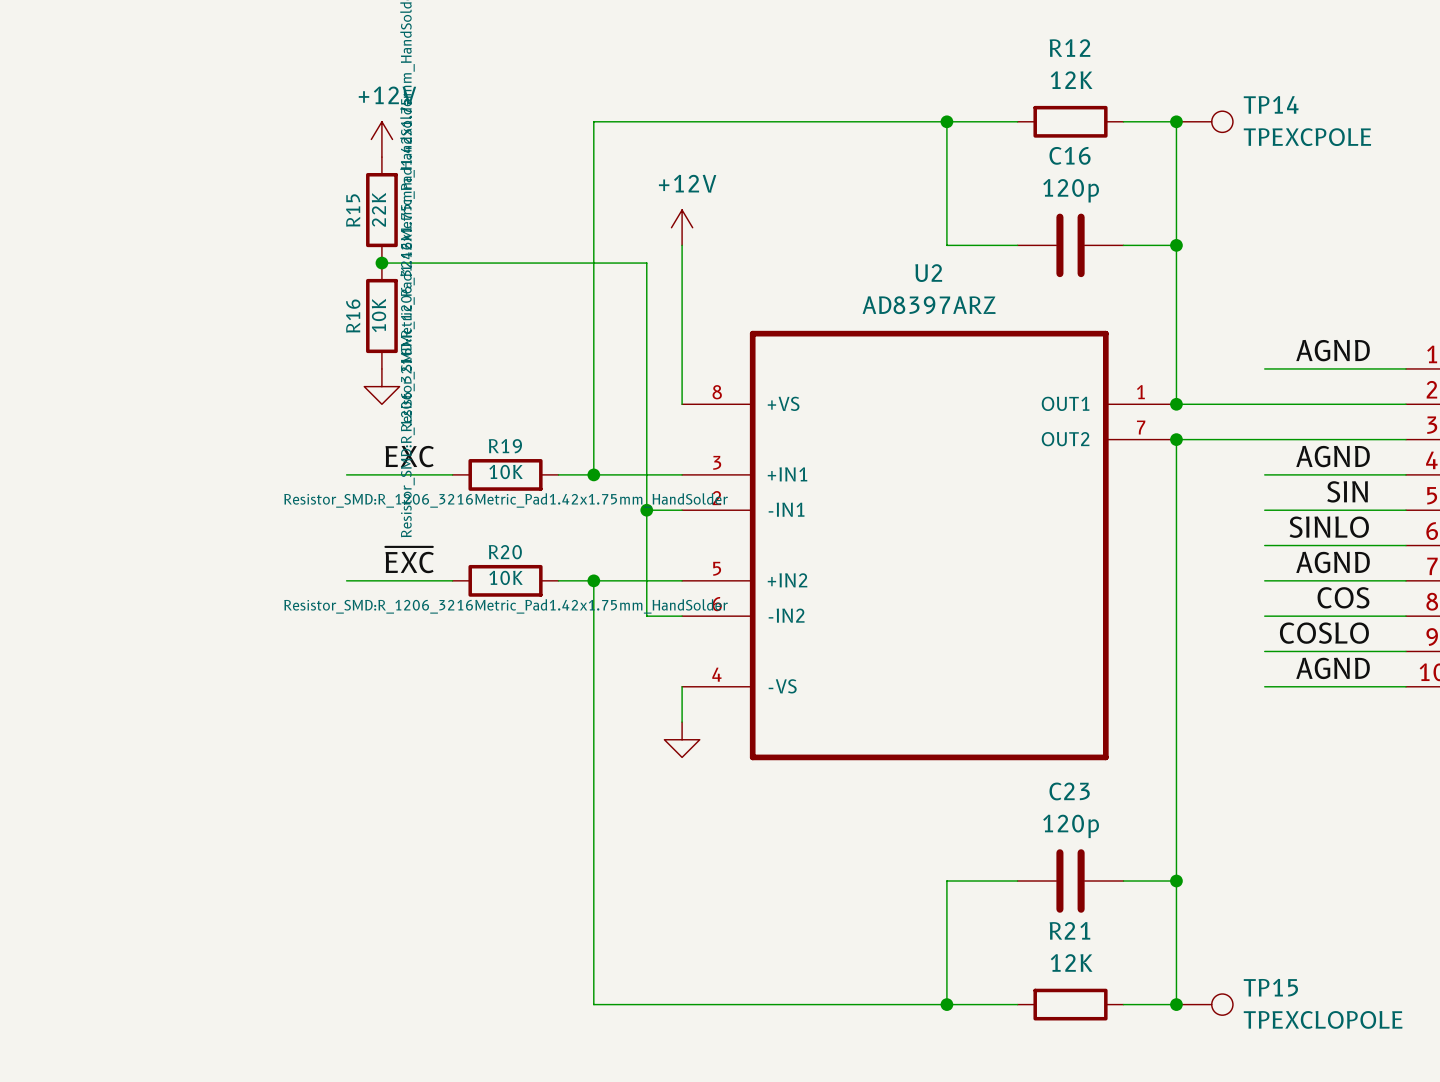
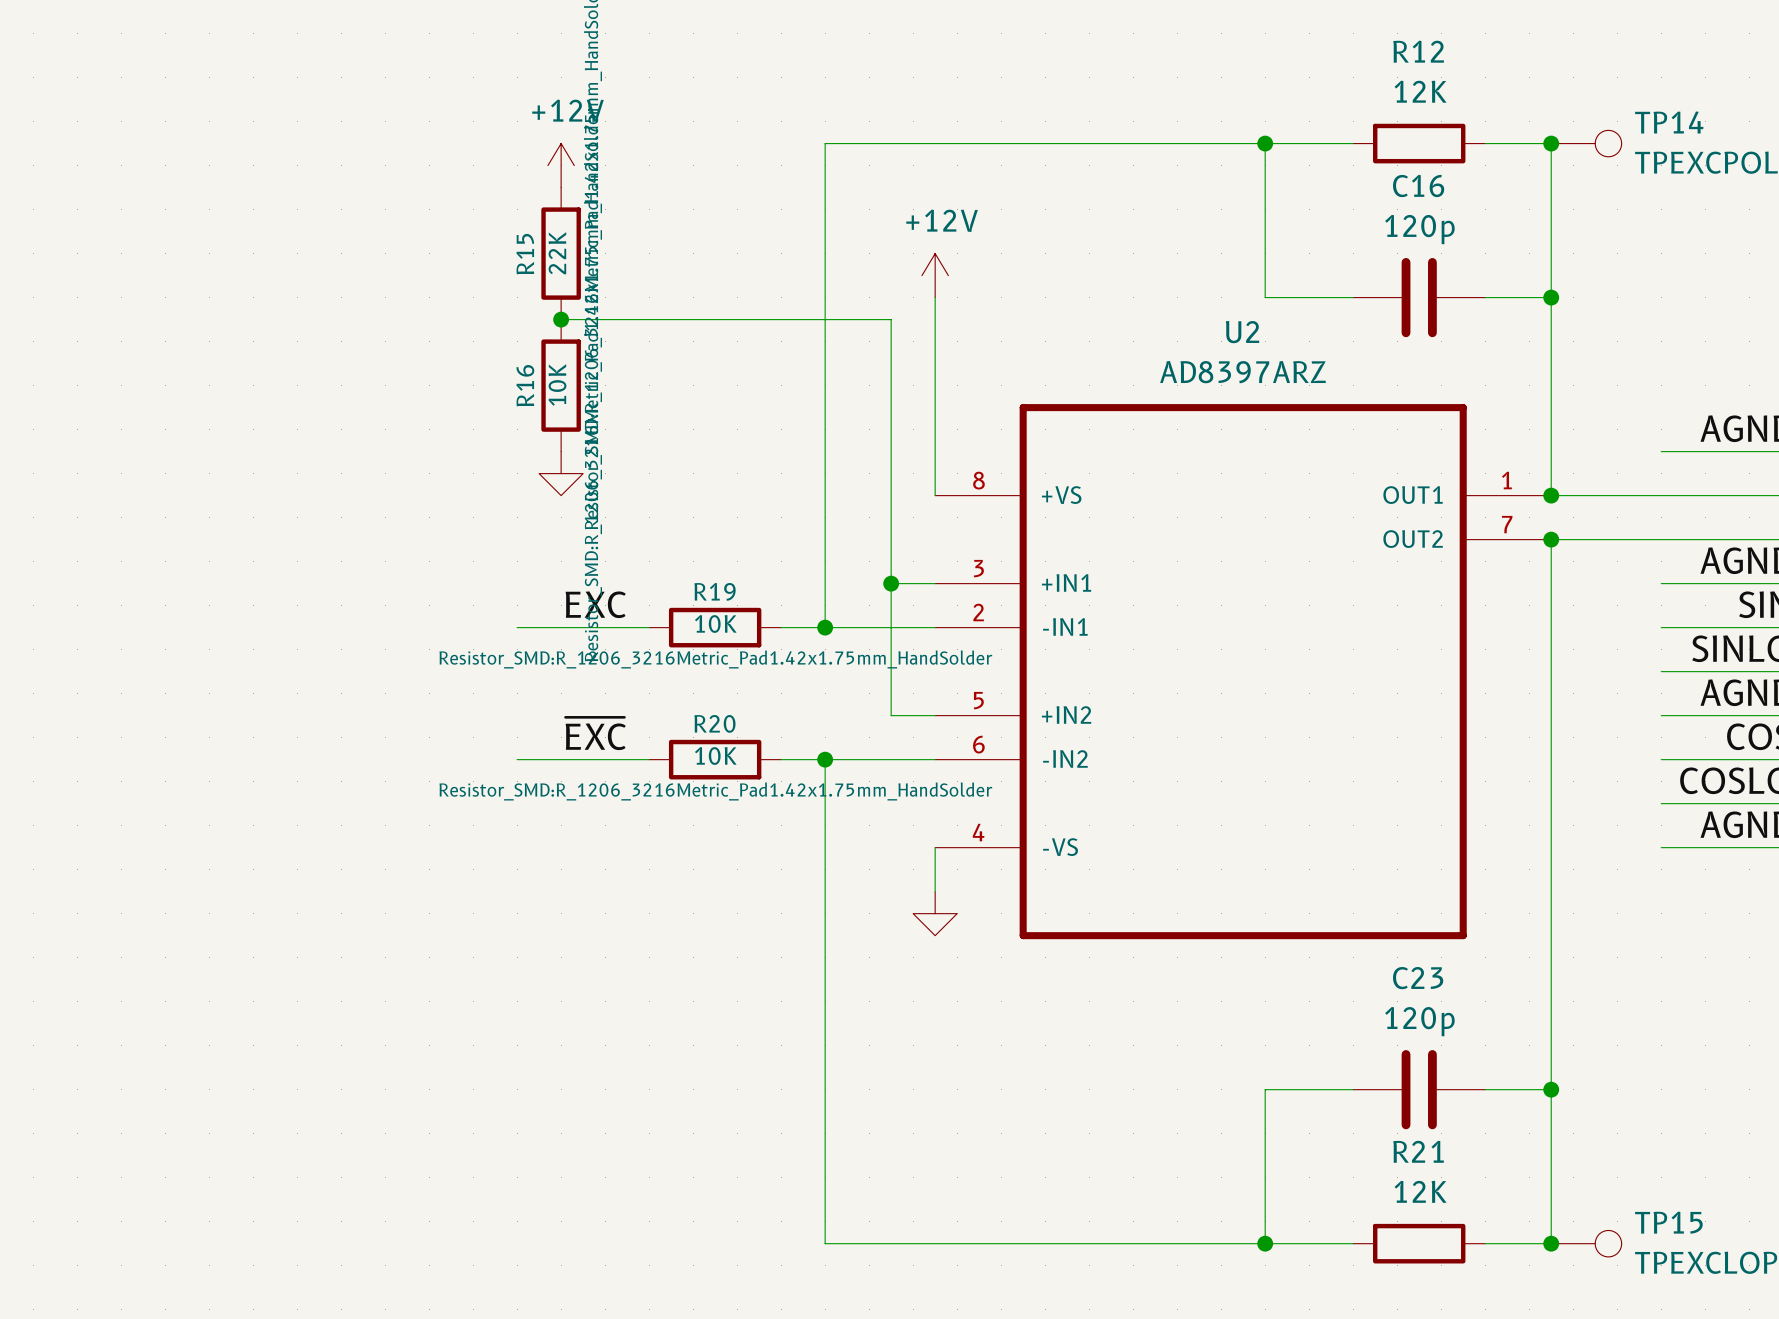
label position: EXC (409, 456) -> EXC (595, 604)
wire: (346, 474) (452, 474) -> (517, 627) (649, 627)
R19 position: (505, 474) -> (715, 627)
wire: (558, 474) (646, 474) -> (781, 627) (891, 627)
junction: (593, 474) -> none
junction: none -> (891, 583)
junction: none -> (825, 627)
junction: (646, 510) -> none
label position: ~{EXC} (409, 560) -> ~{EXC} (595, 733)
wire: (346, 580) (452, 580) -> (517, 759) (649, 759)
R20 position: (505, 580) -> (715, 759)
wire: (558, 580) (646, 580) (646, 616) -> (781, 759) (891, 759)
wire: (593, 580) (593, 616) -> (825, 583) (825, 627)
junction: (593, 580) -> none
junction: none -> (825, 759)

